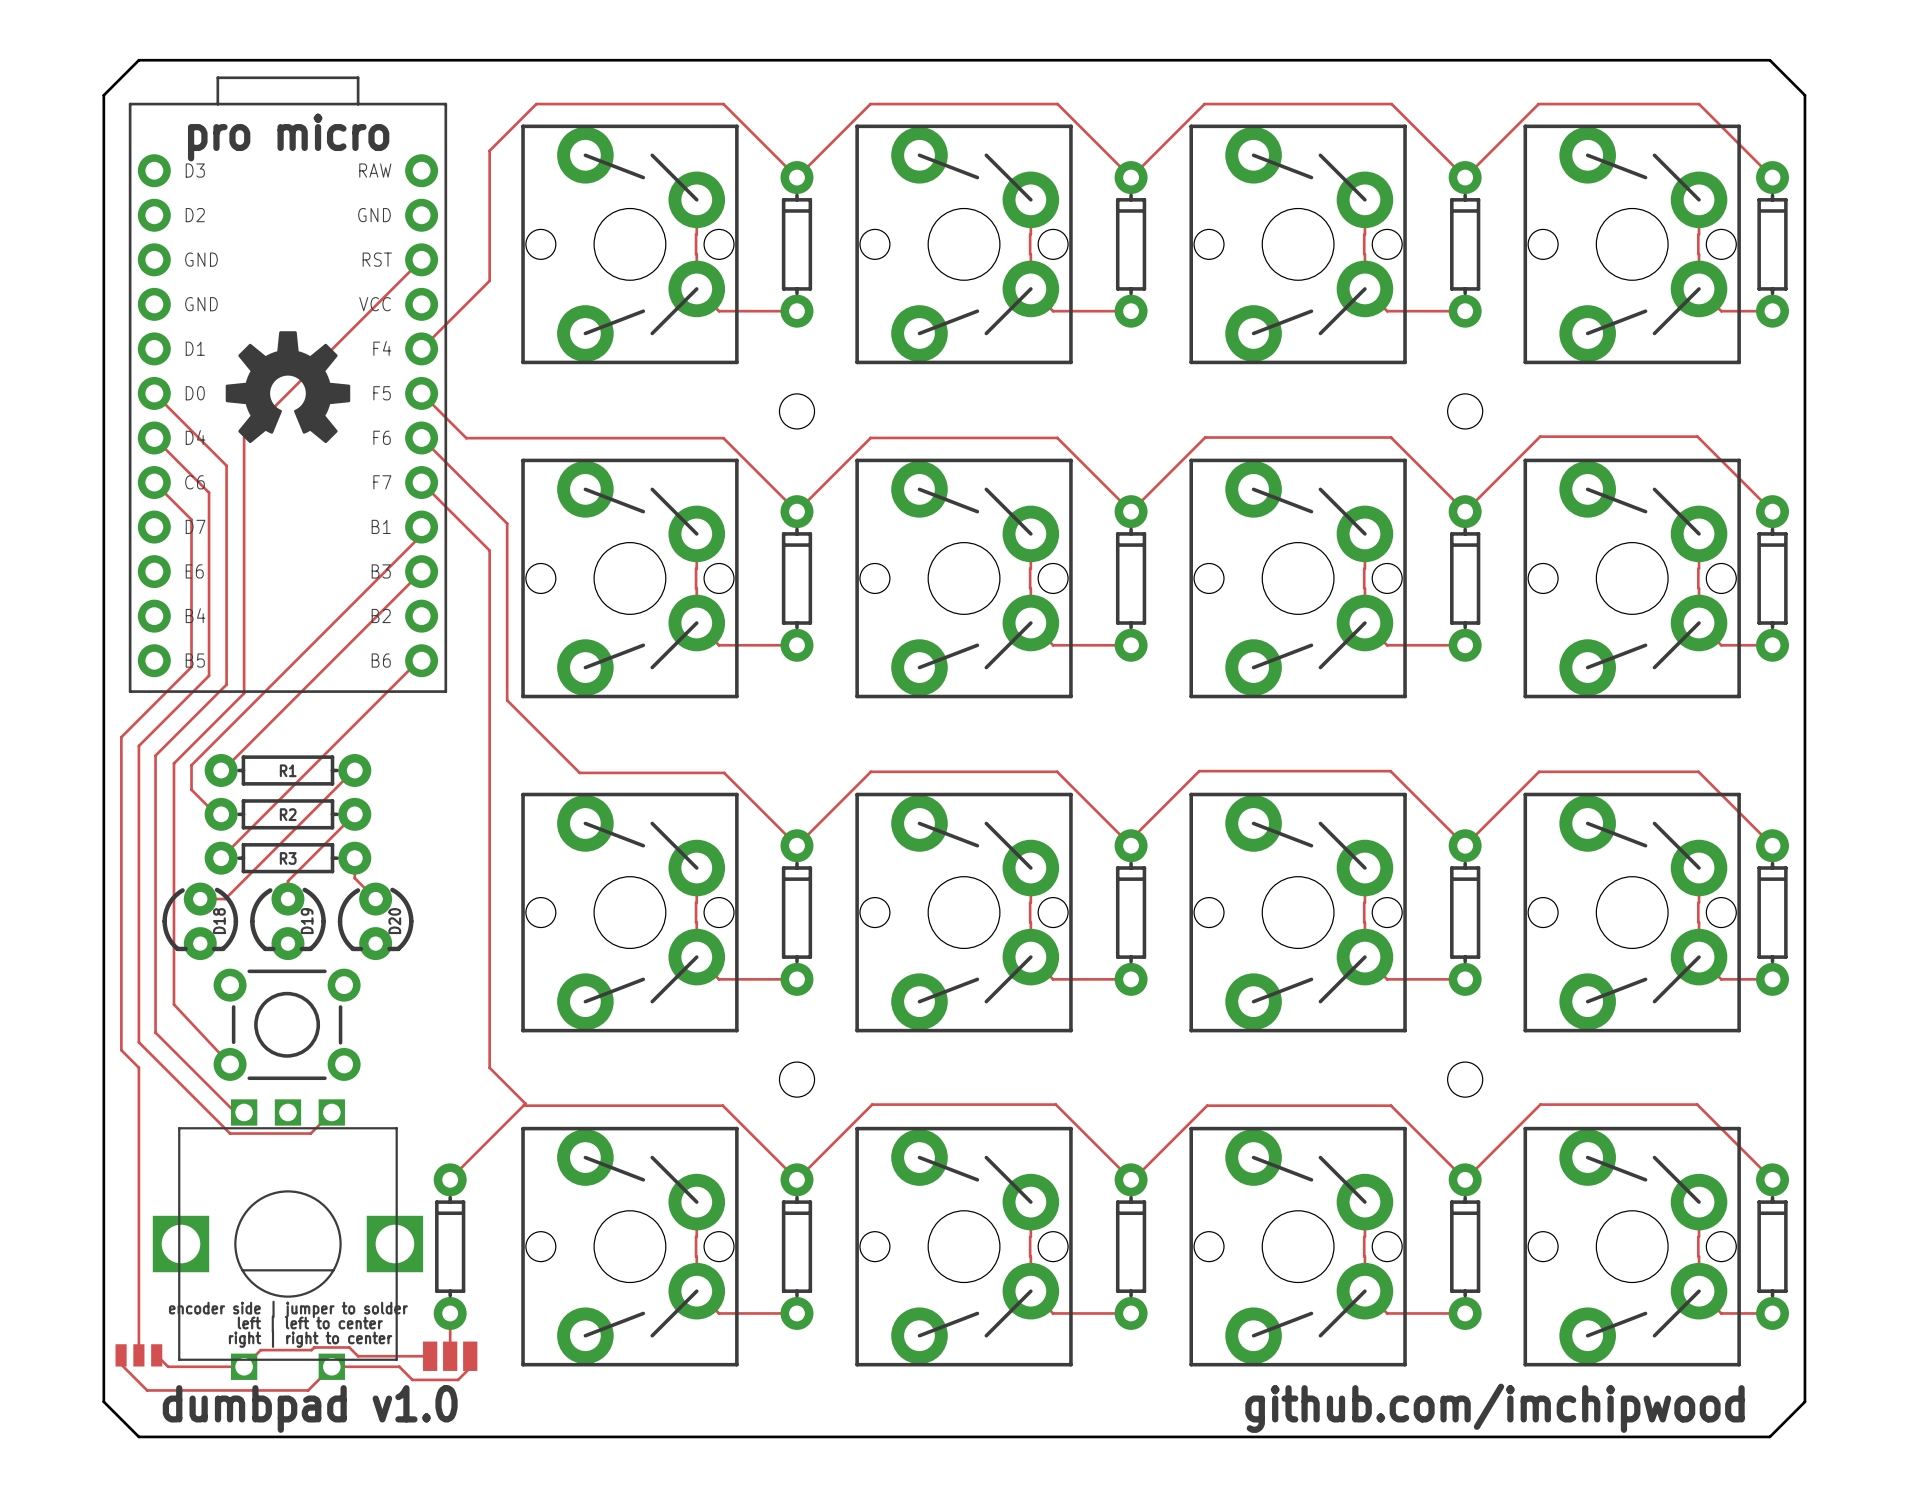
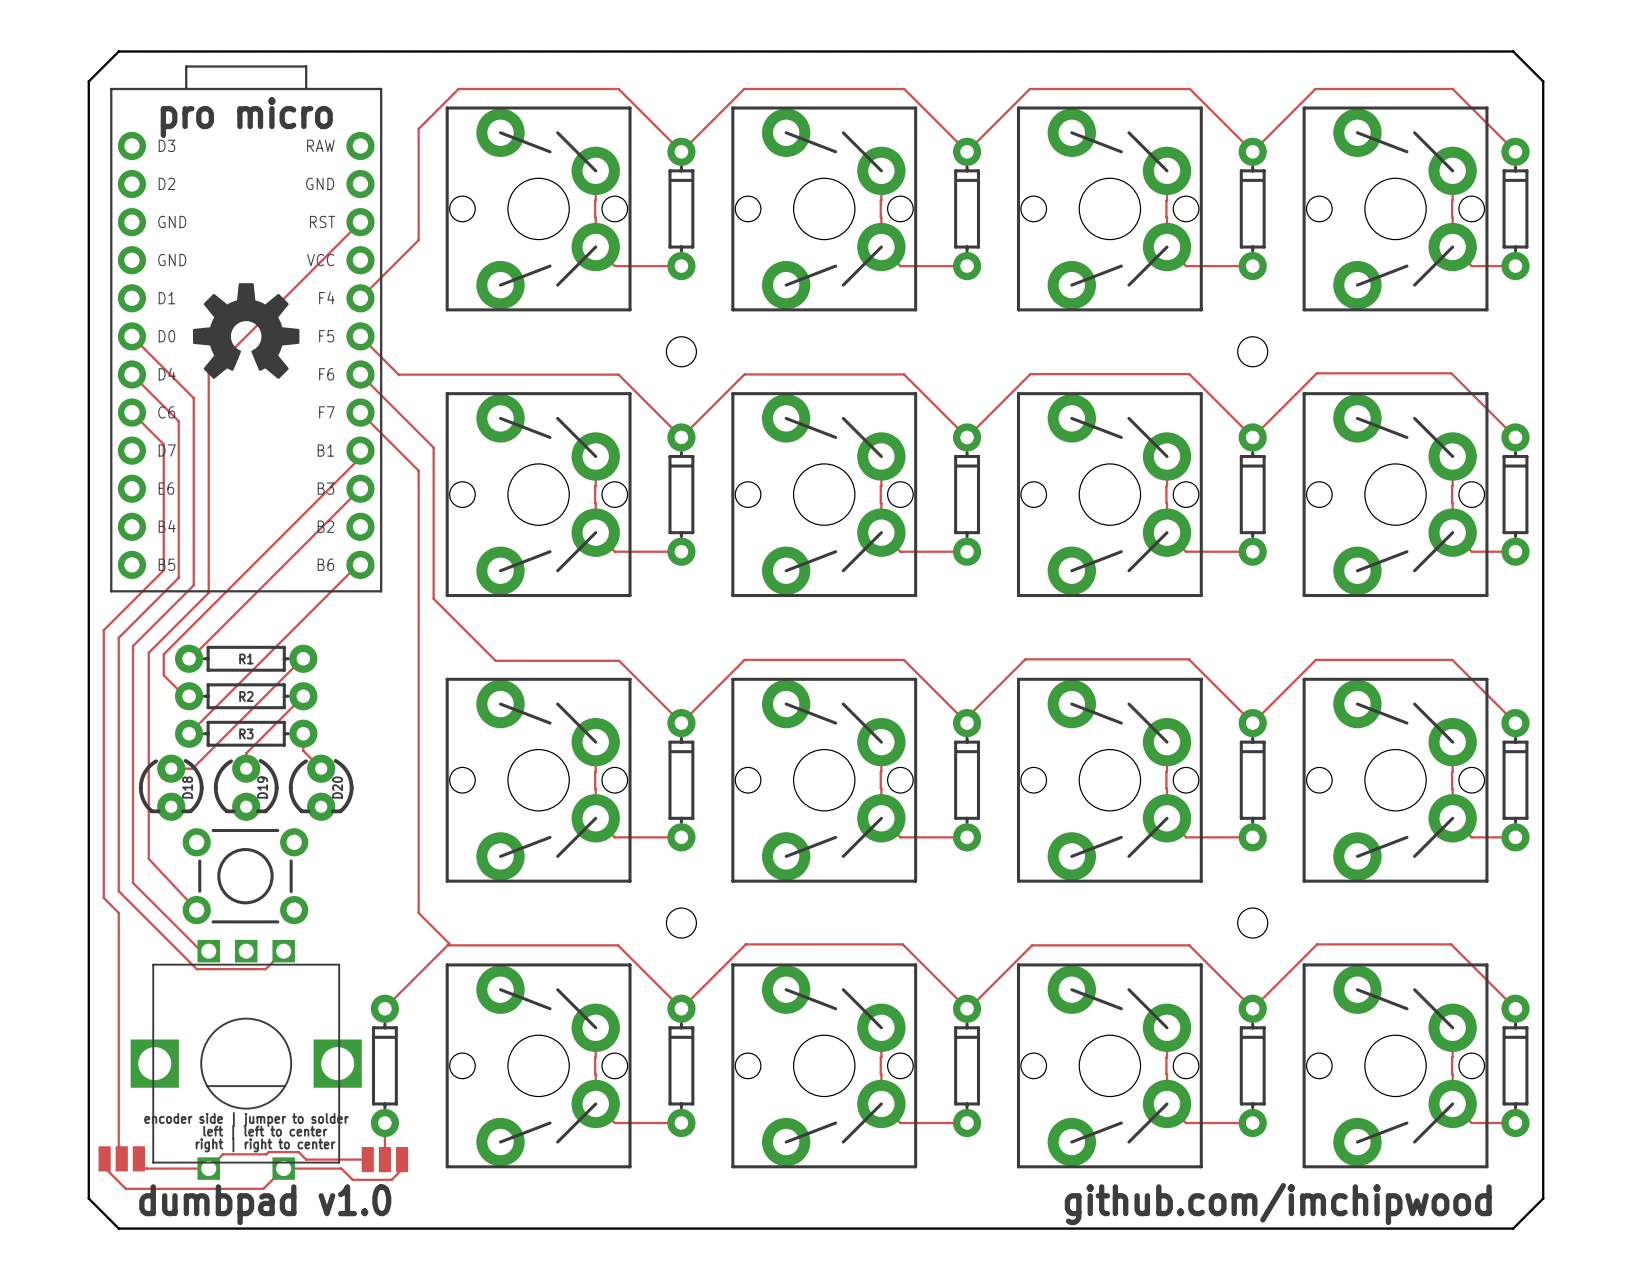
part footprint: [115, 1344, 163, 1367] -> [98, 1146, 145, 1172]

